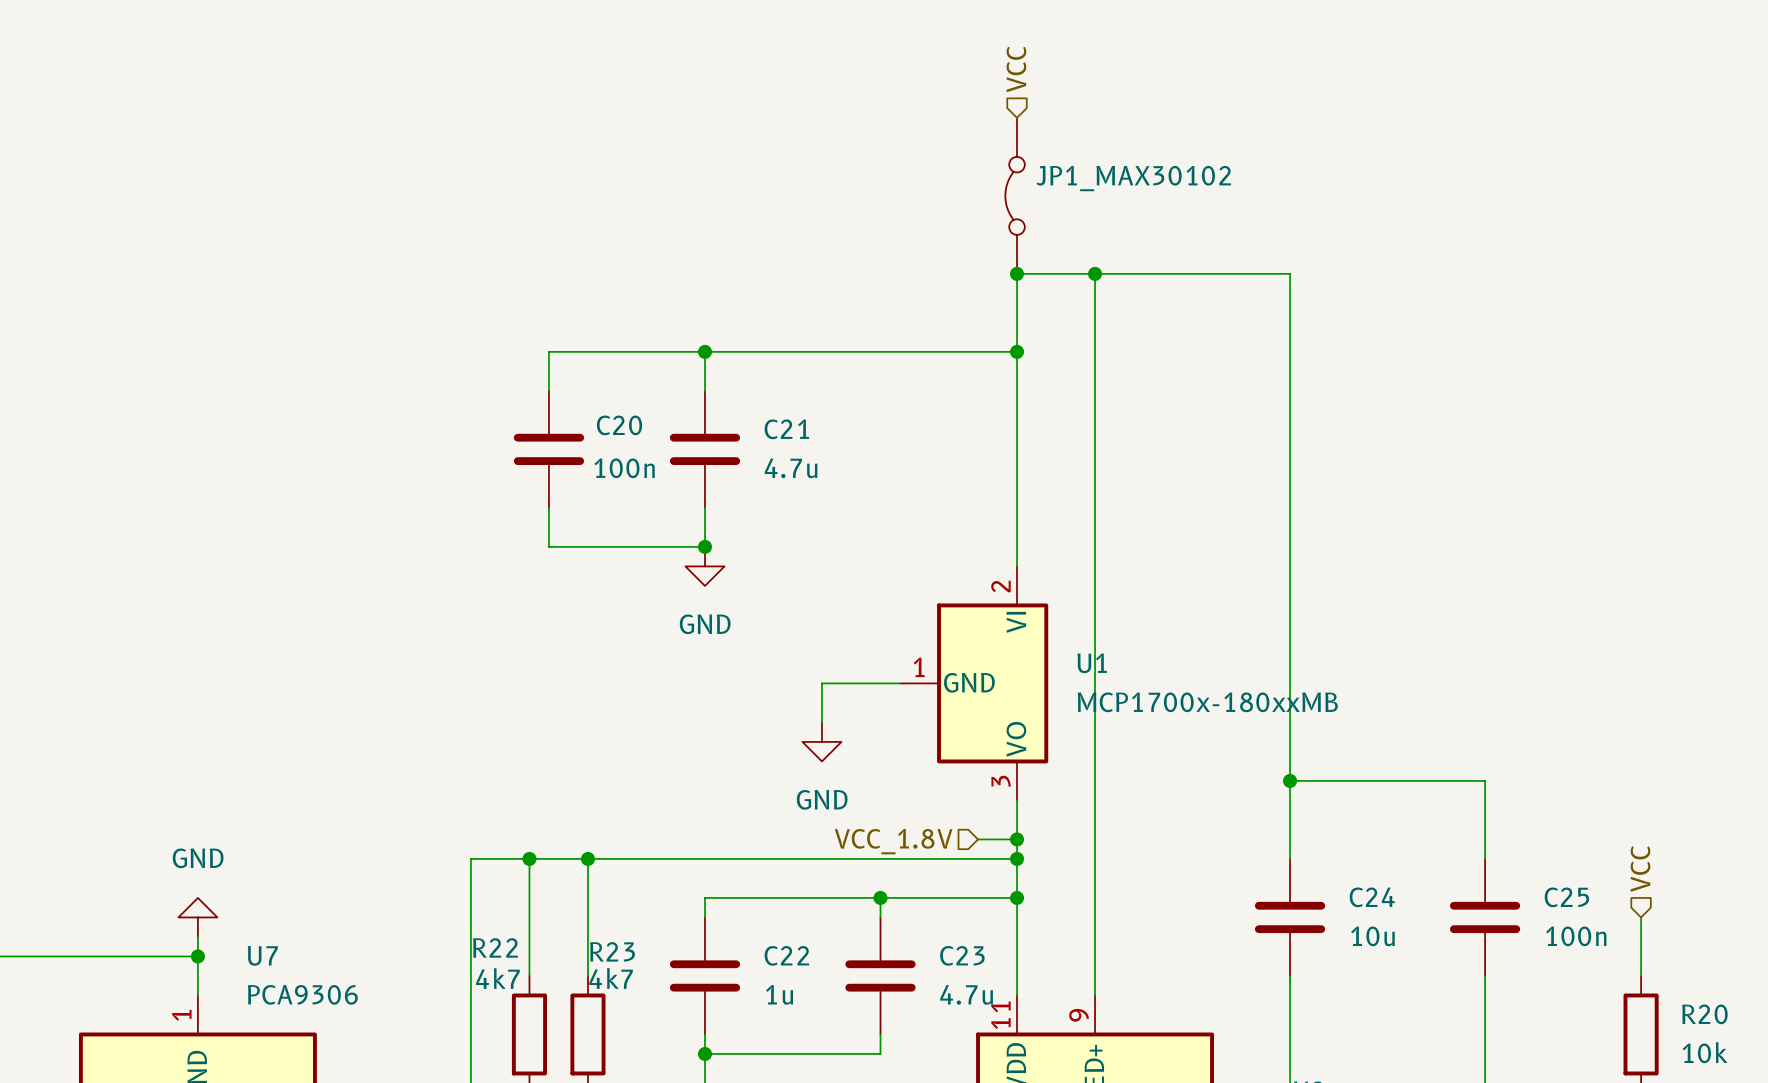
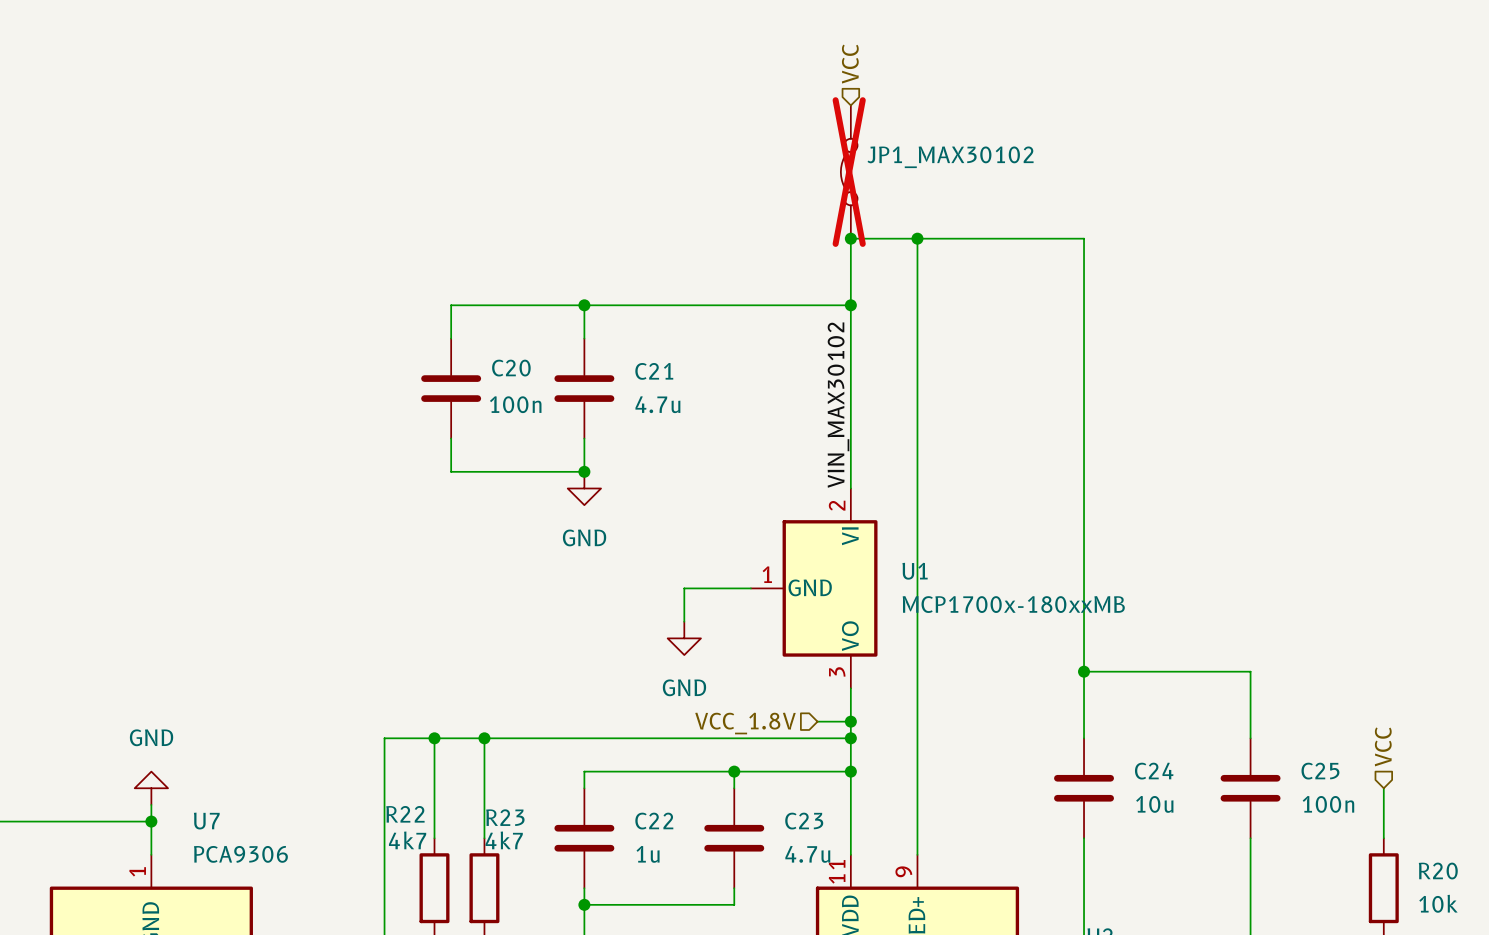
JP1_MAX30102 do-not-place cross: none -> (849, 172)
label: none -> VIN_MAX30102 (838, 405)

